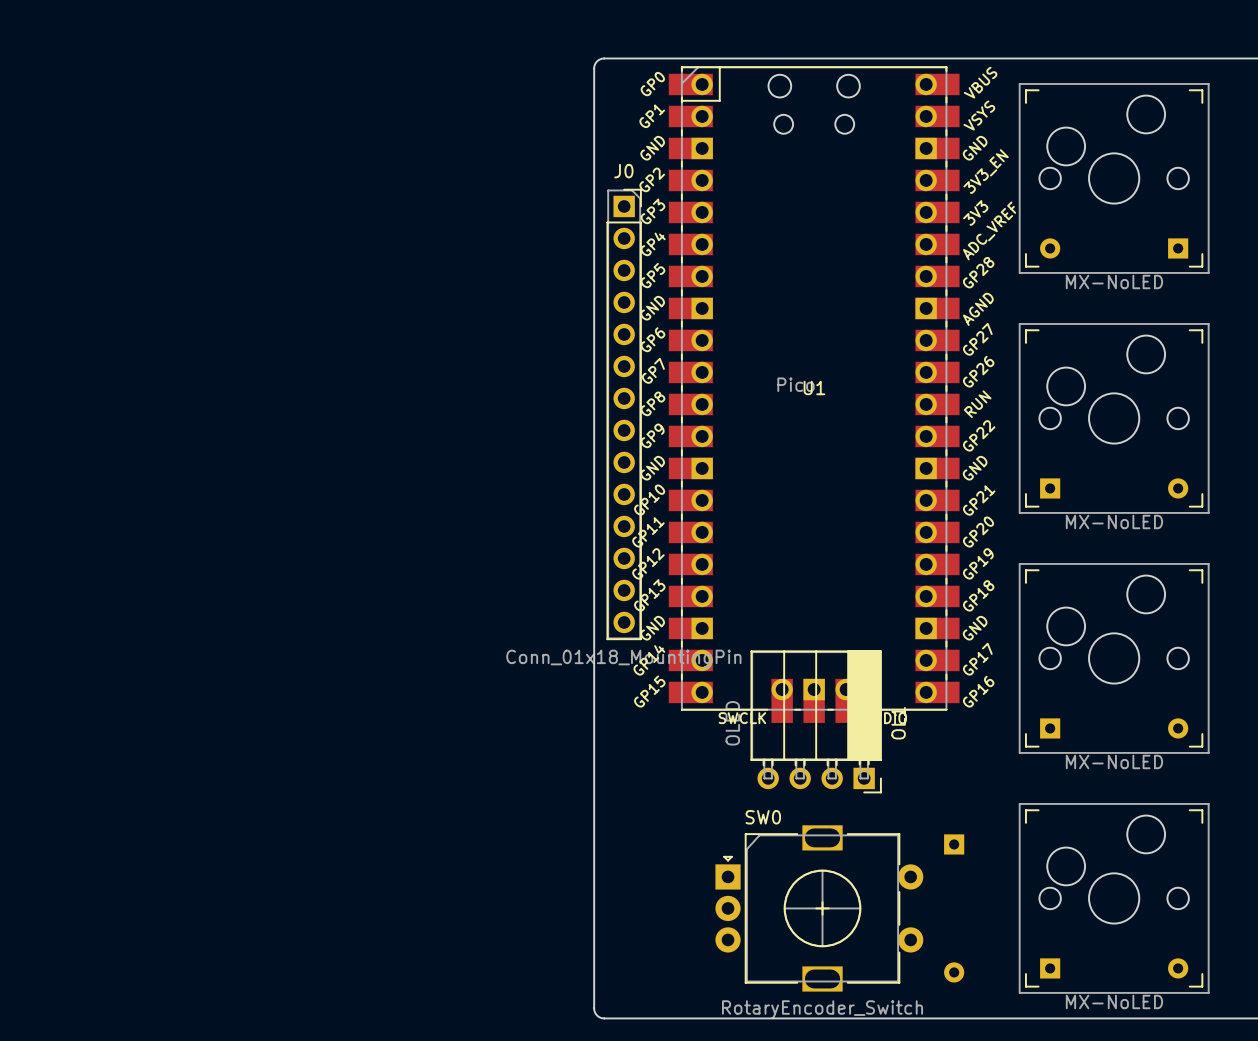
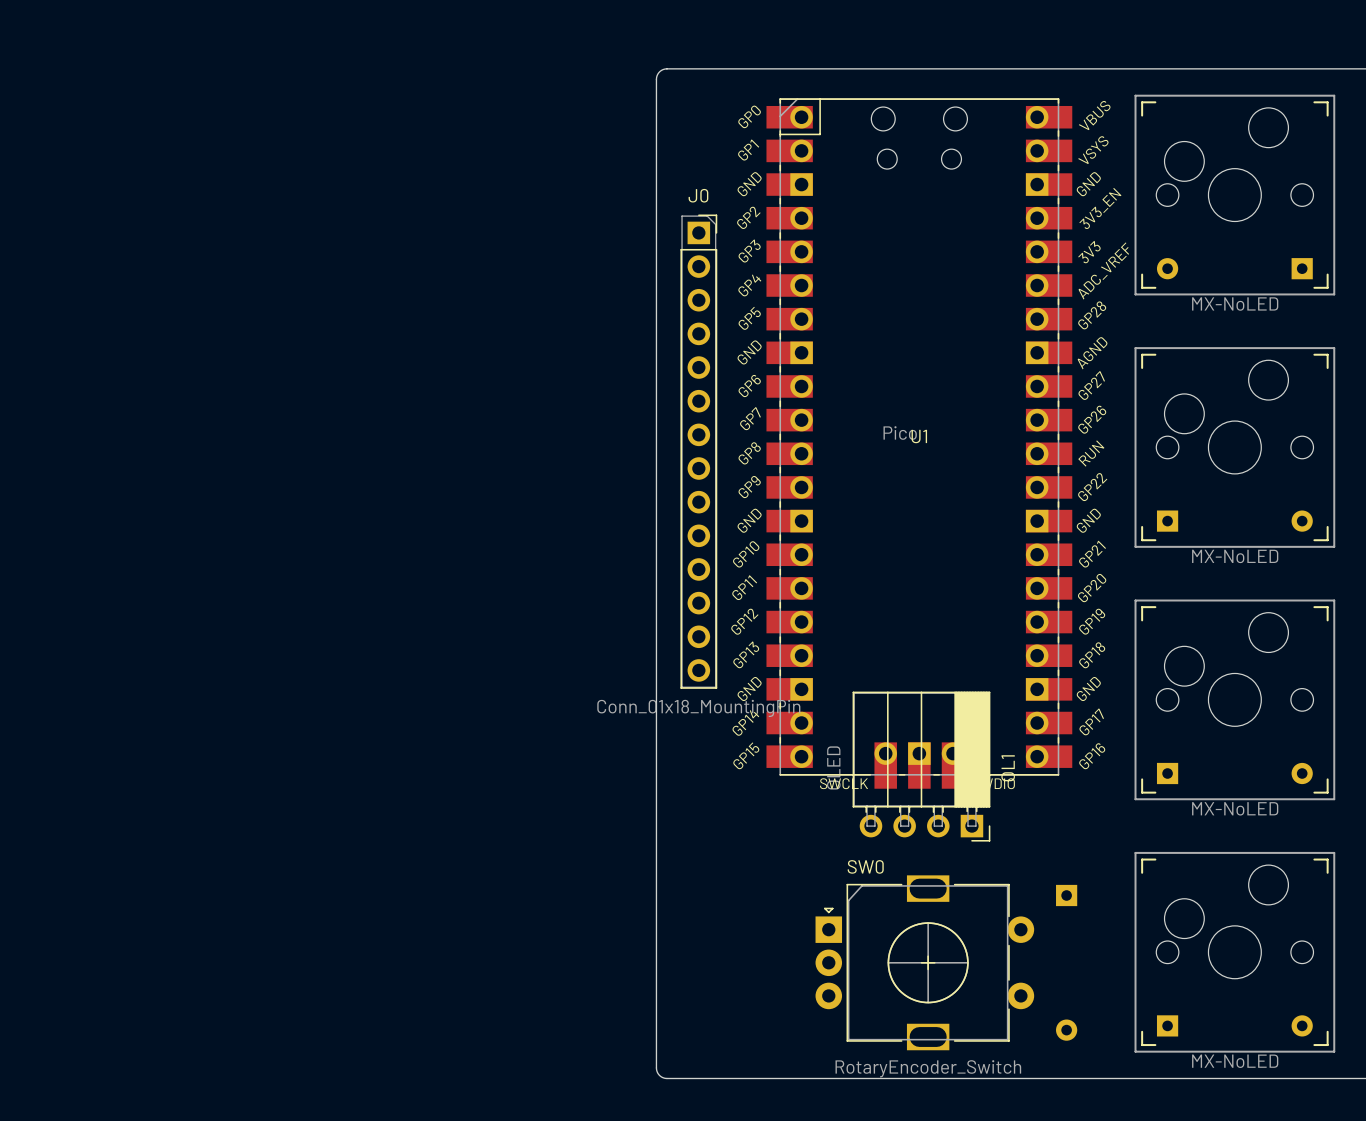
board edge: (604, 58) (597, 61) (594, 68) (594, 1008) (597, 1015) (604, 1018) -> (698, 68) (664, 69) (658, 72) (656, 79) (656, 1067) (658, 1074) (664, 1078) (698, 1078)
U1 position: (814, 394) -> (919, 443)
J0 position: (624, 414) -> (698, 451)

